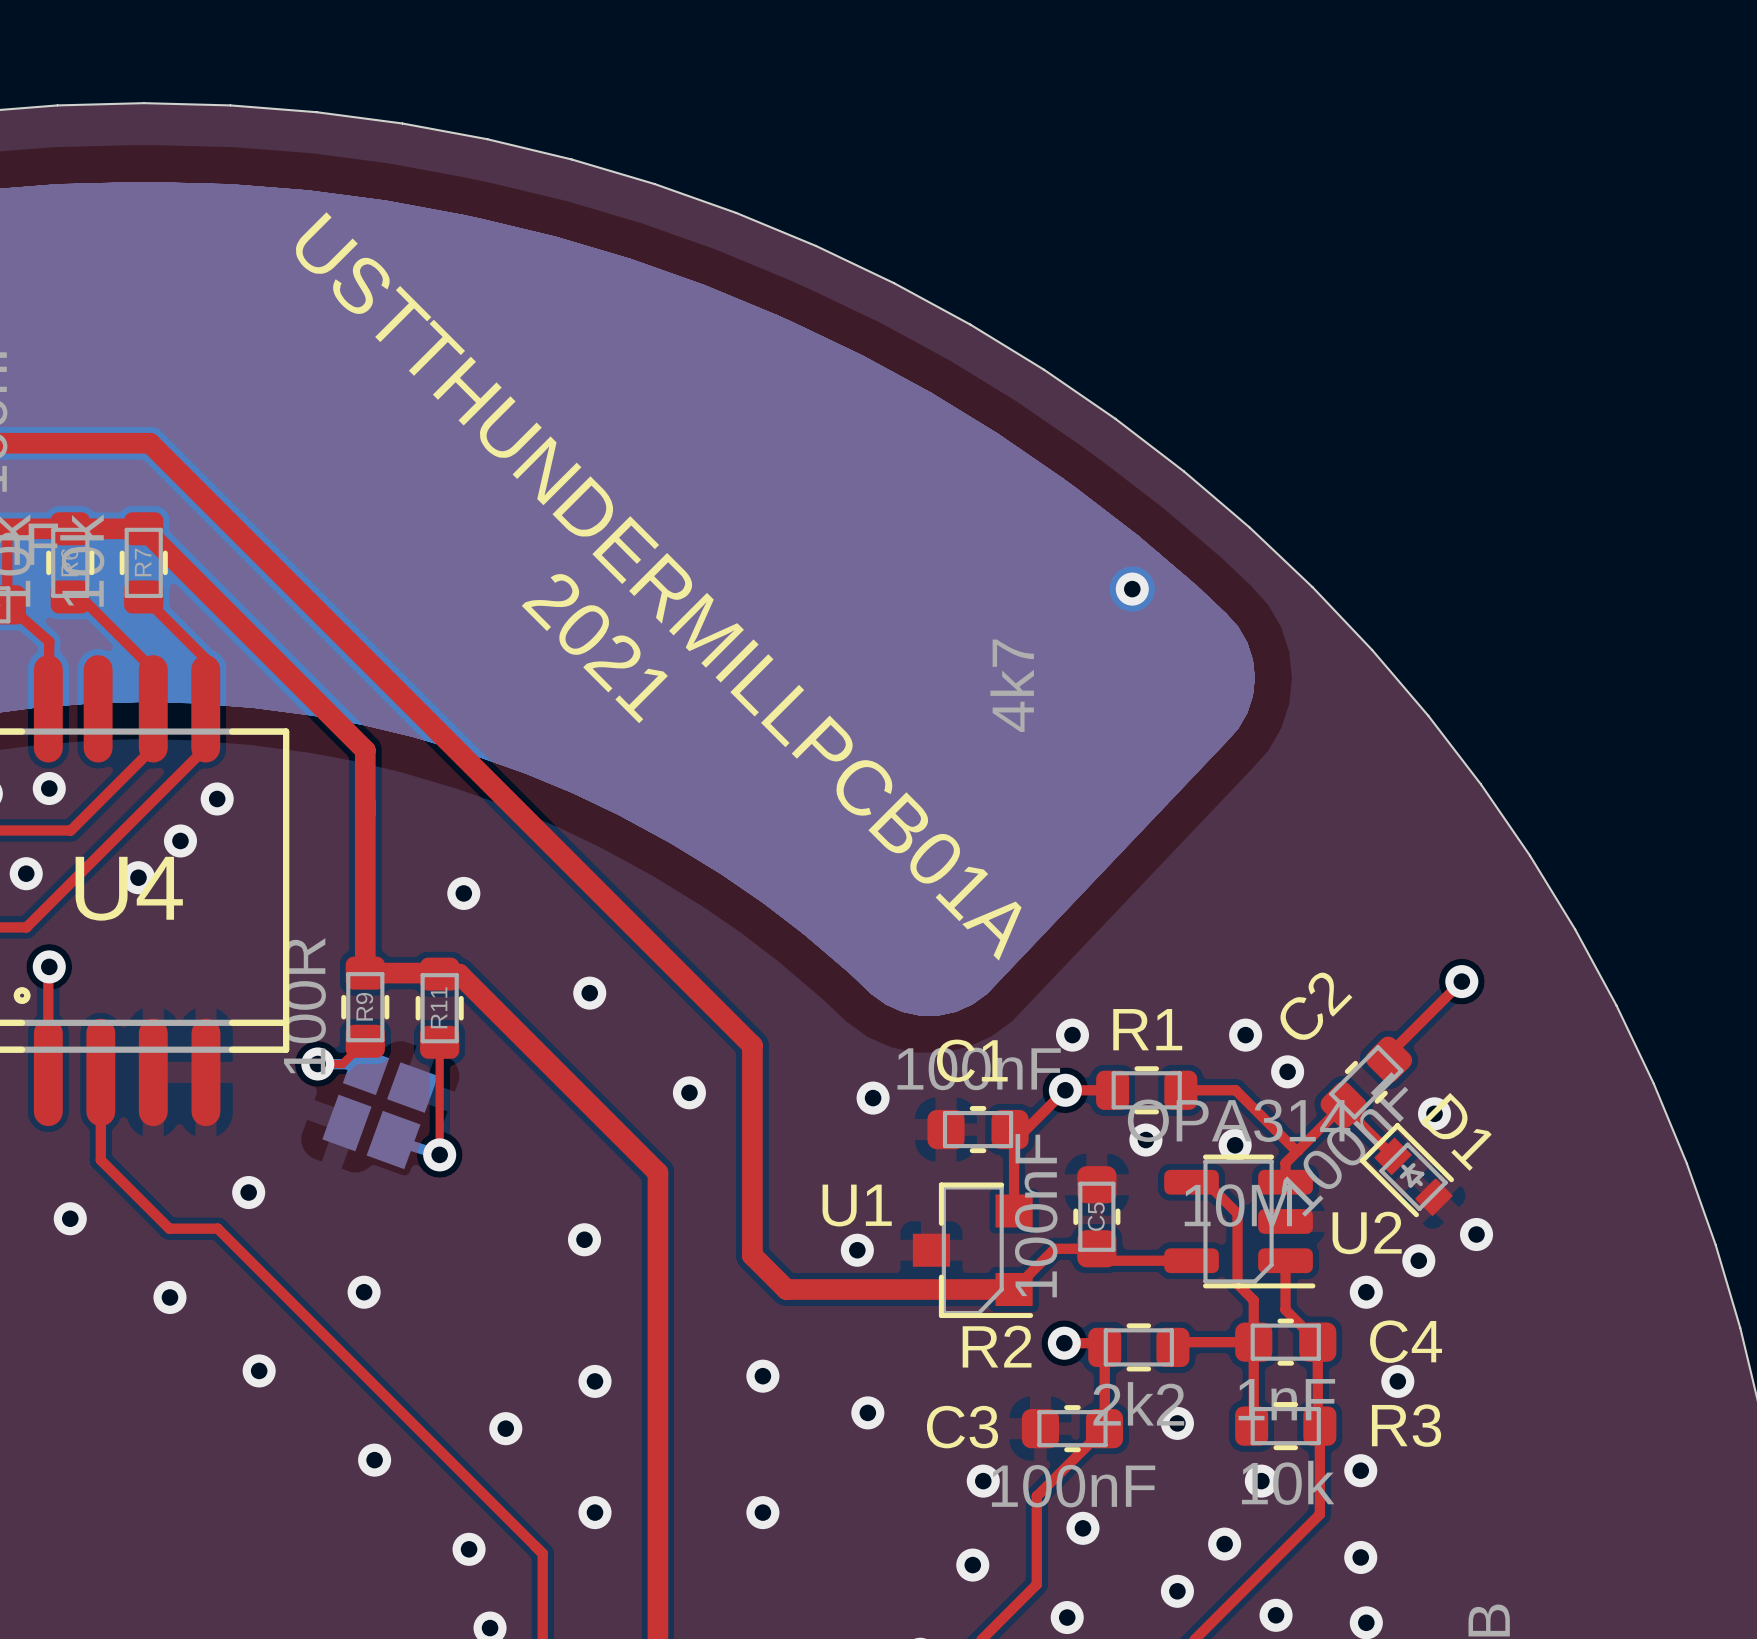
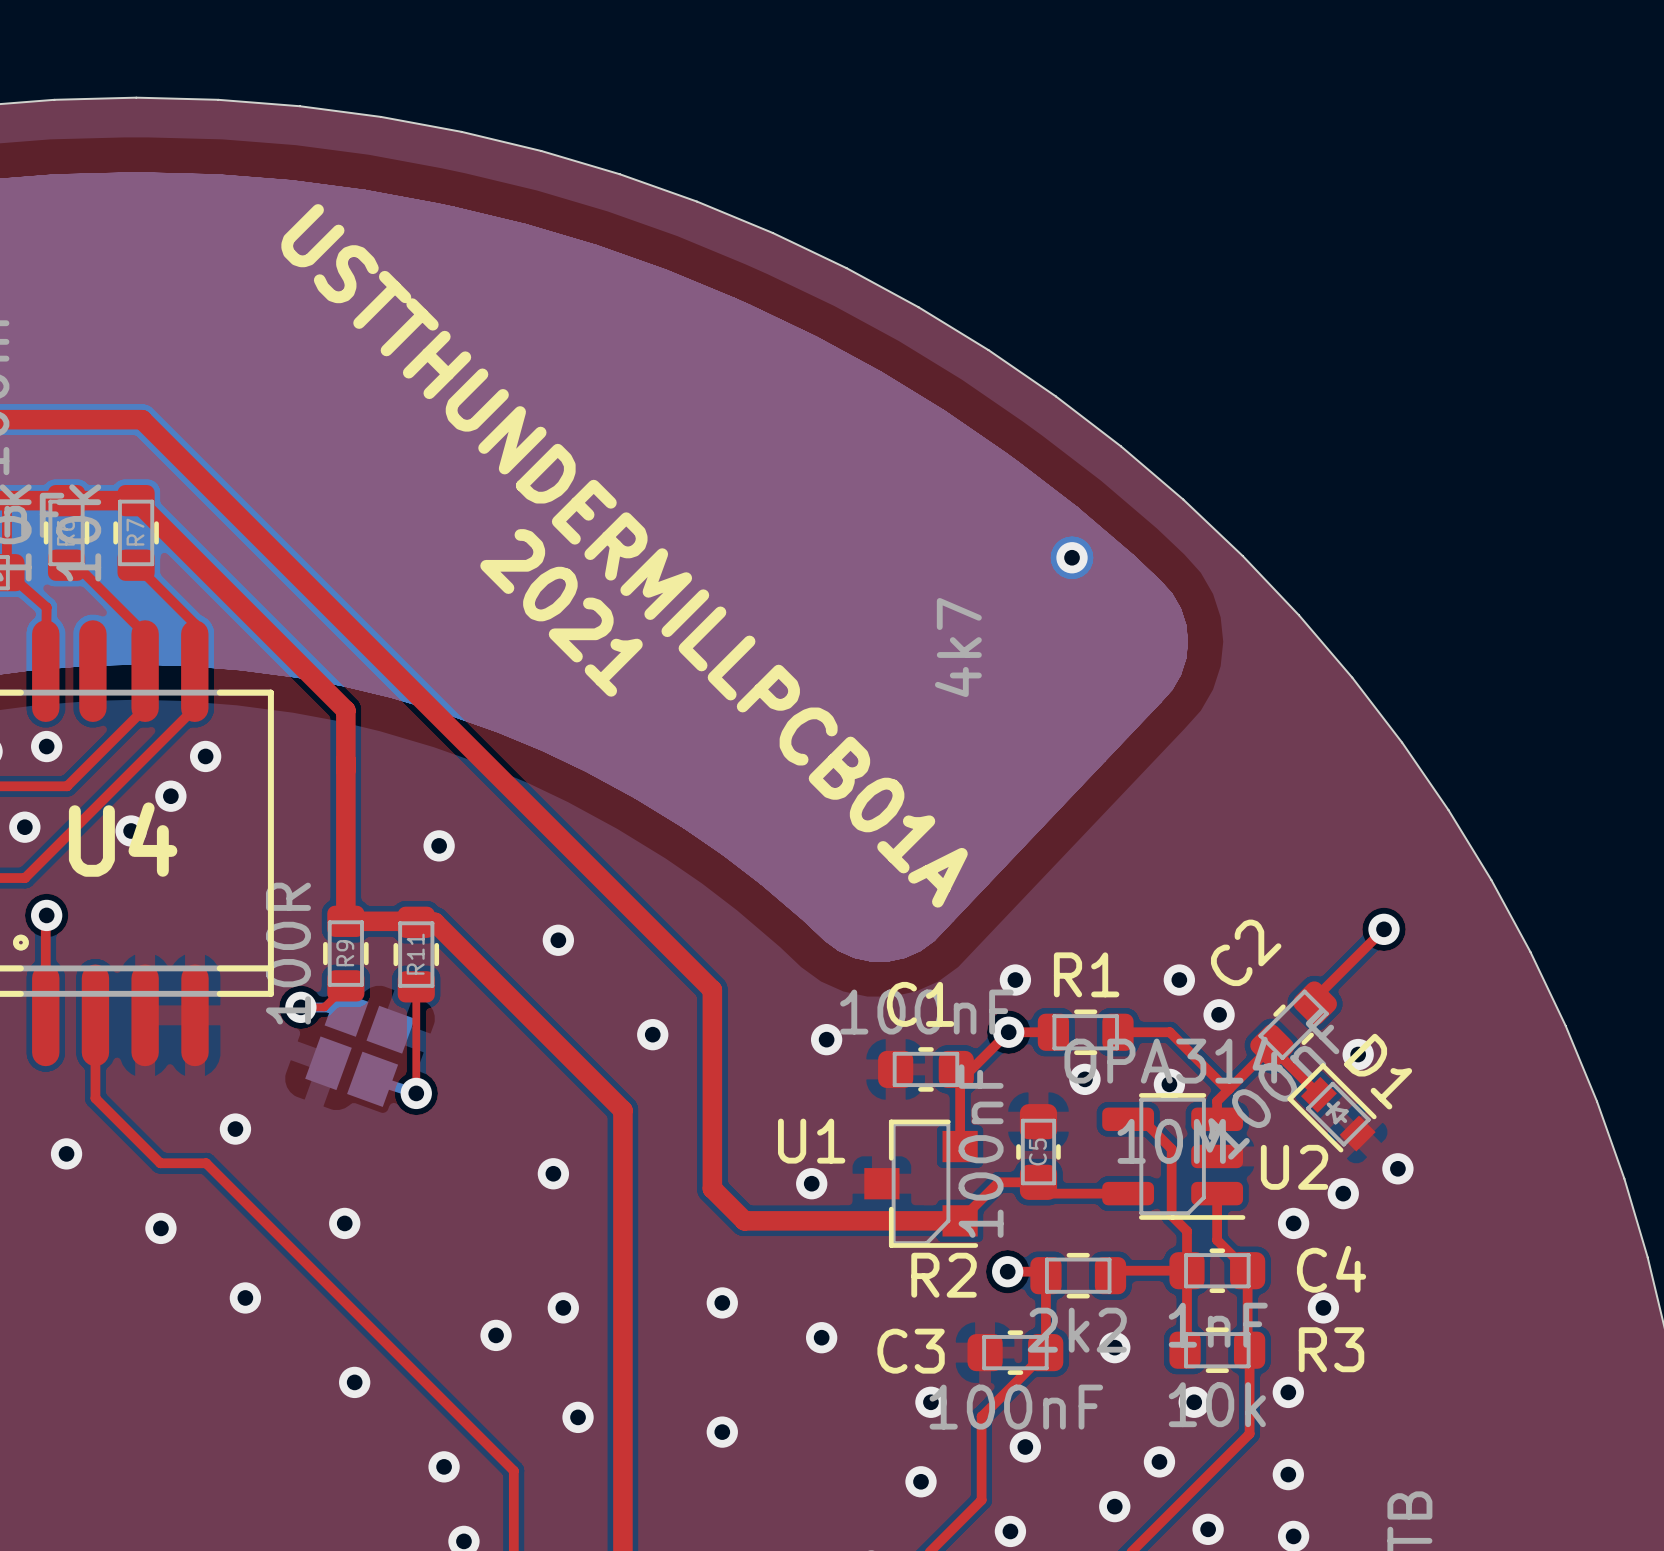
via position: (505, 1428) -> (496, 1335)
via position: (594, 1512) -> (578, 1417)

